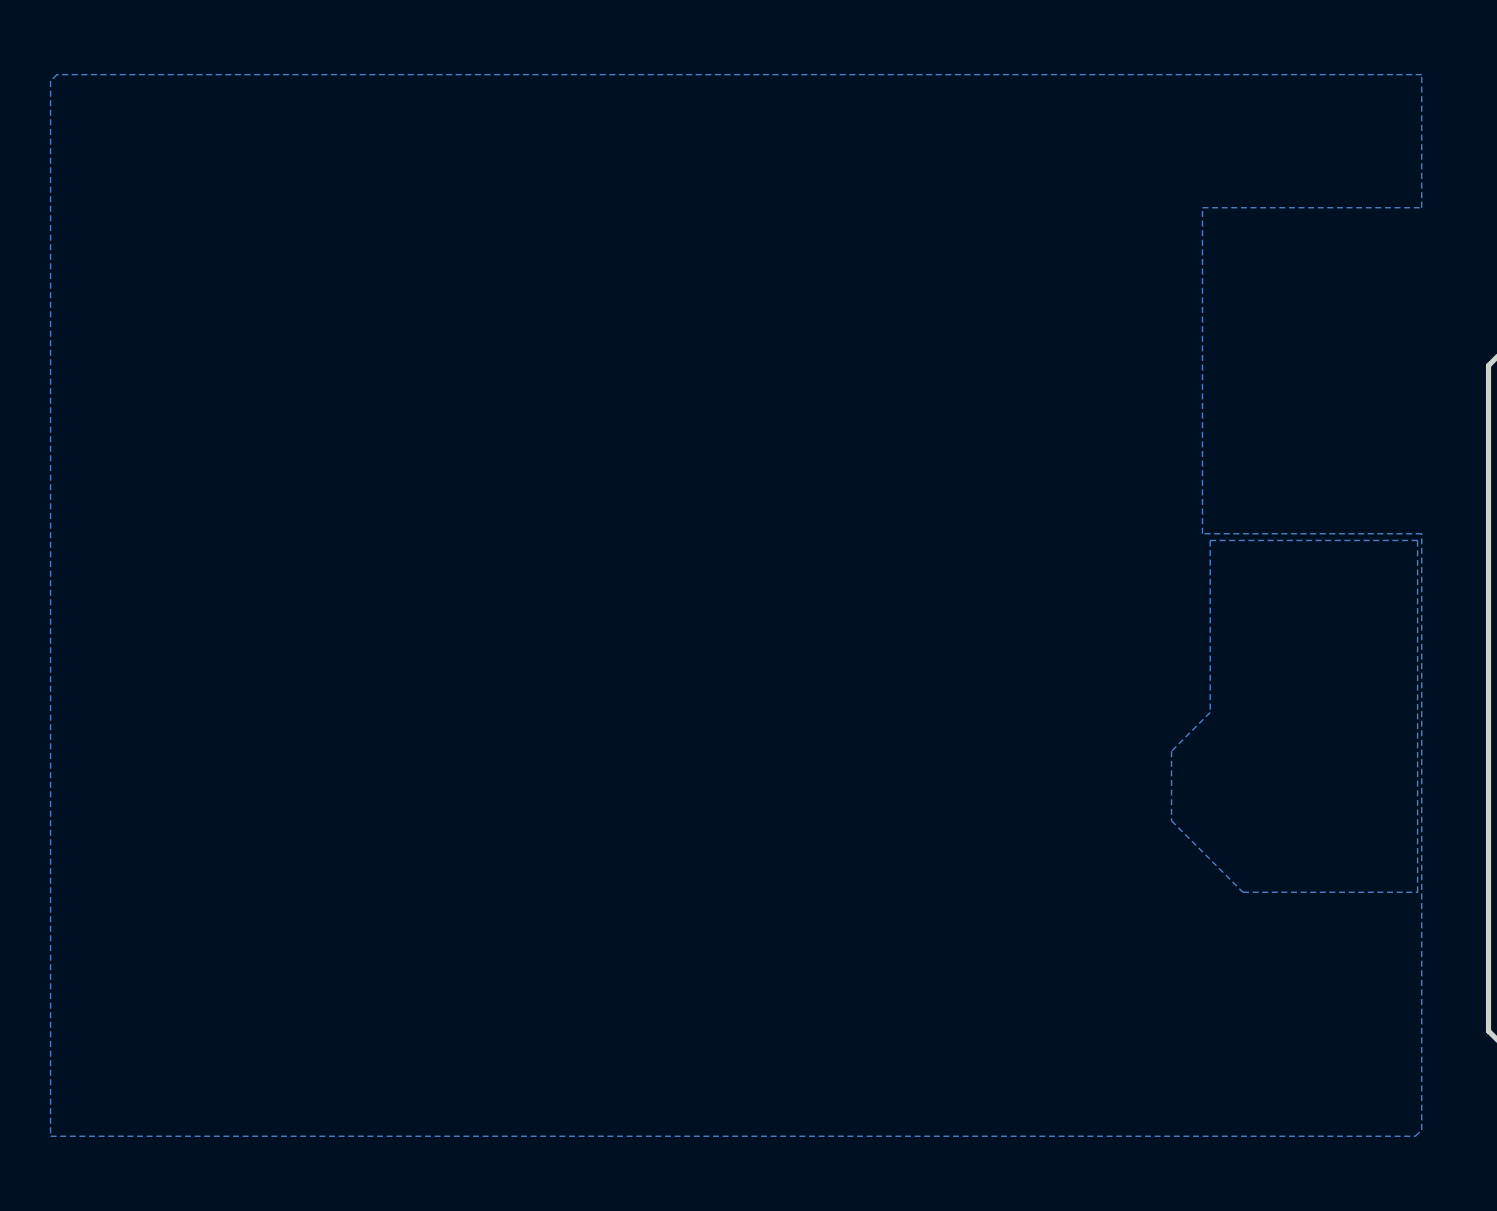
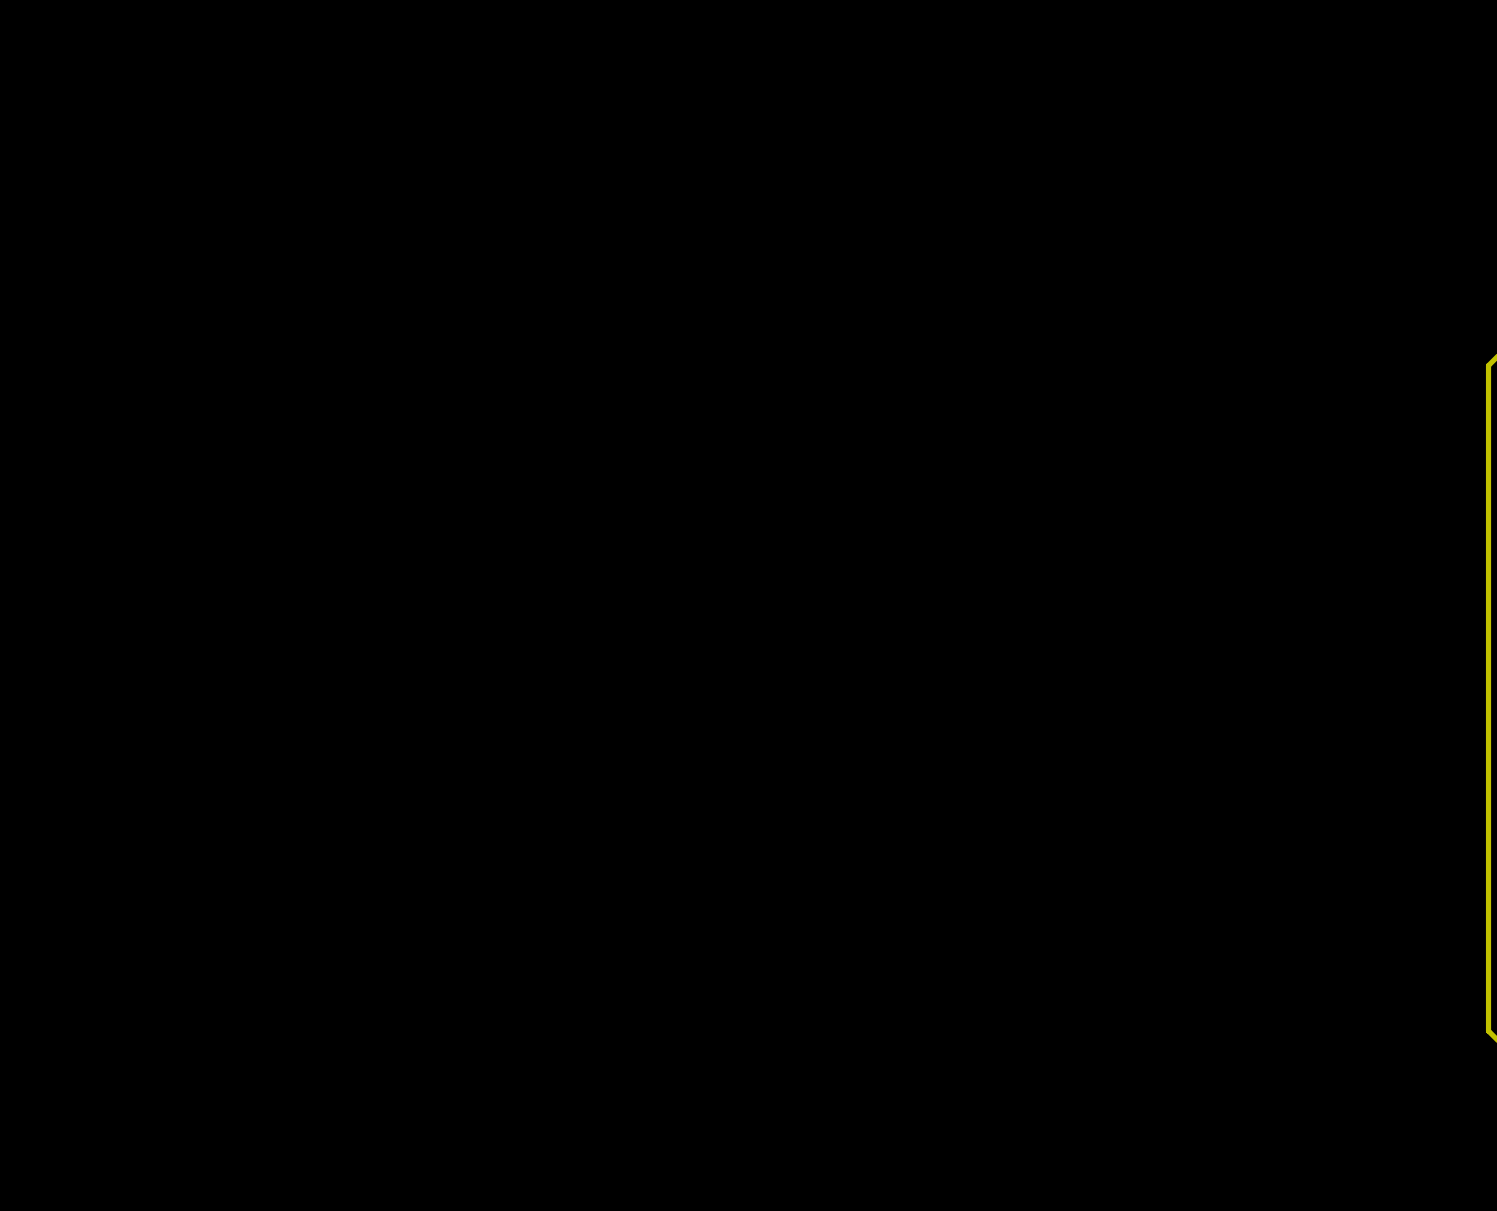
zone outline: (1421, 74) (1421, 207) (1202, 207) (1202, 533) (1421, 533) (1421, 1129) (1415, 1136) (50, 1136) (50, 81) (56, 74) (1421, 74) -> none
zone outline: (1417, 540) (1417, 892) (1242, 892) (1171, 820) (1171, 751) (1210, 712) (1210, 540) (1417, 540) -> none

